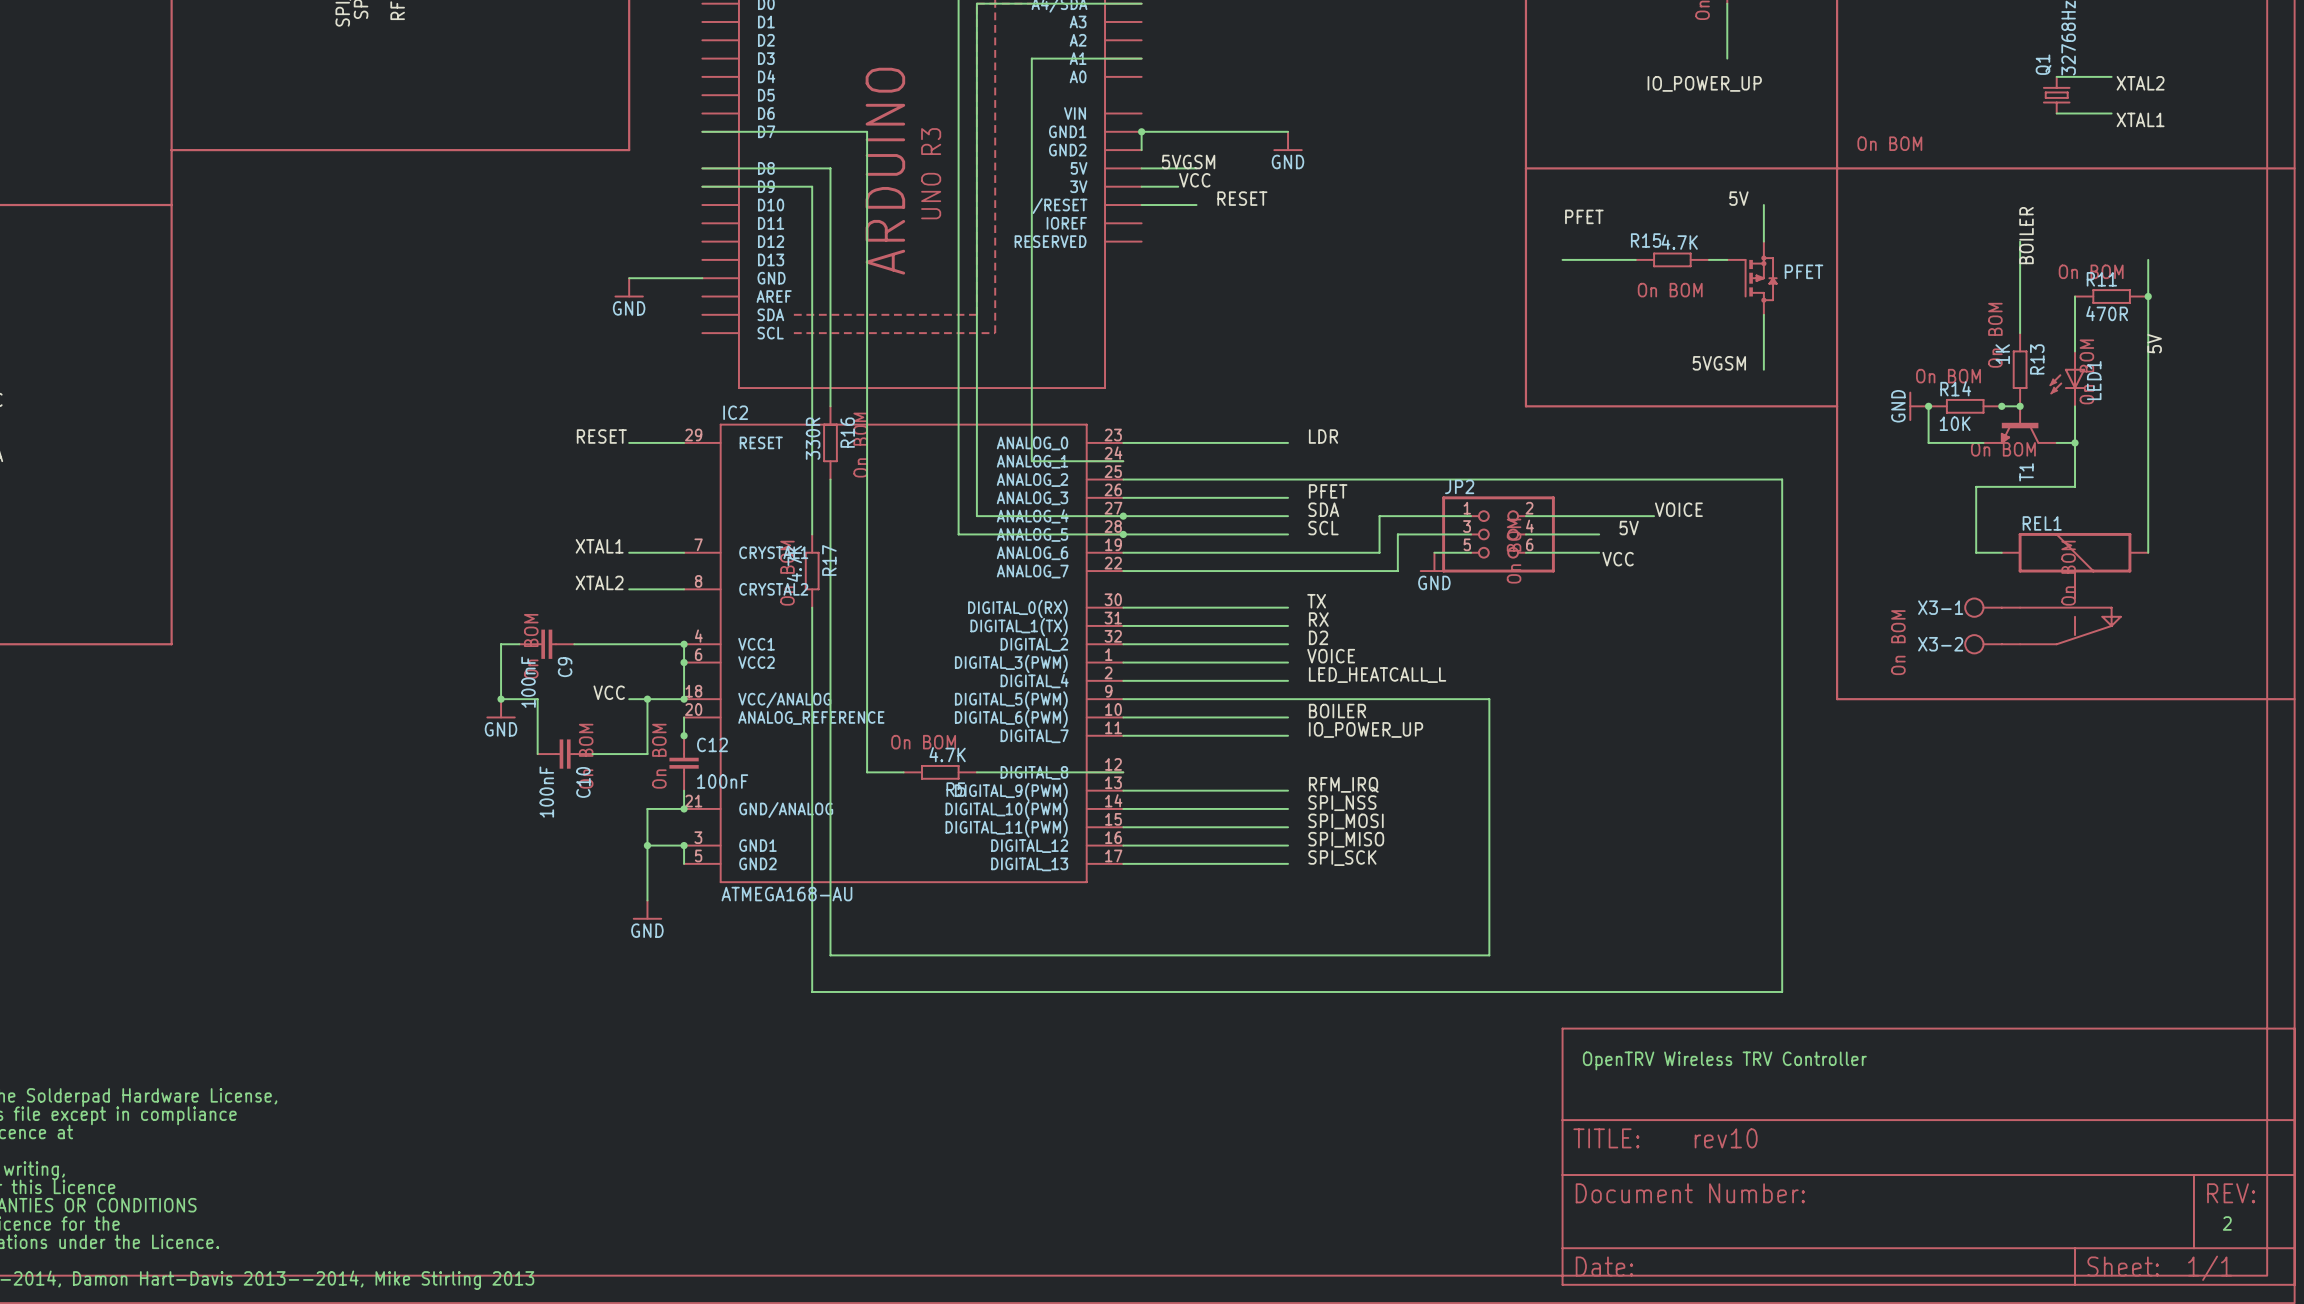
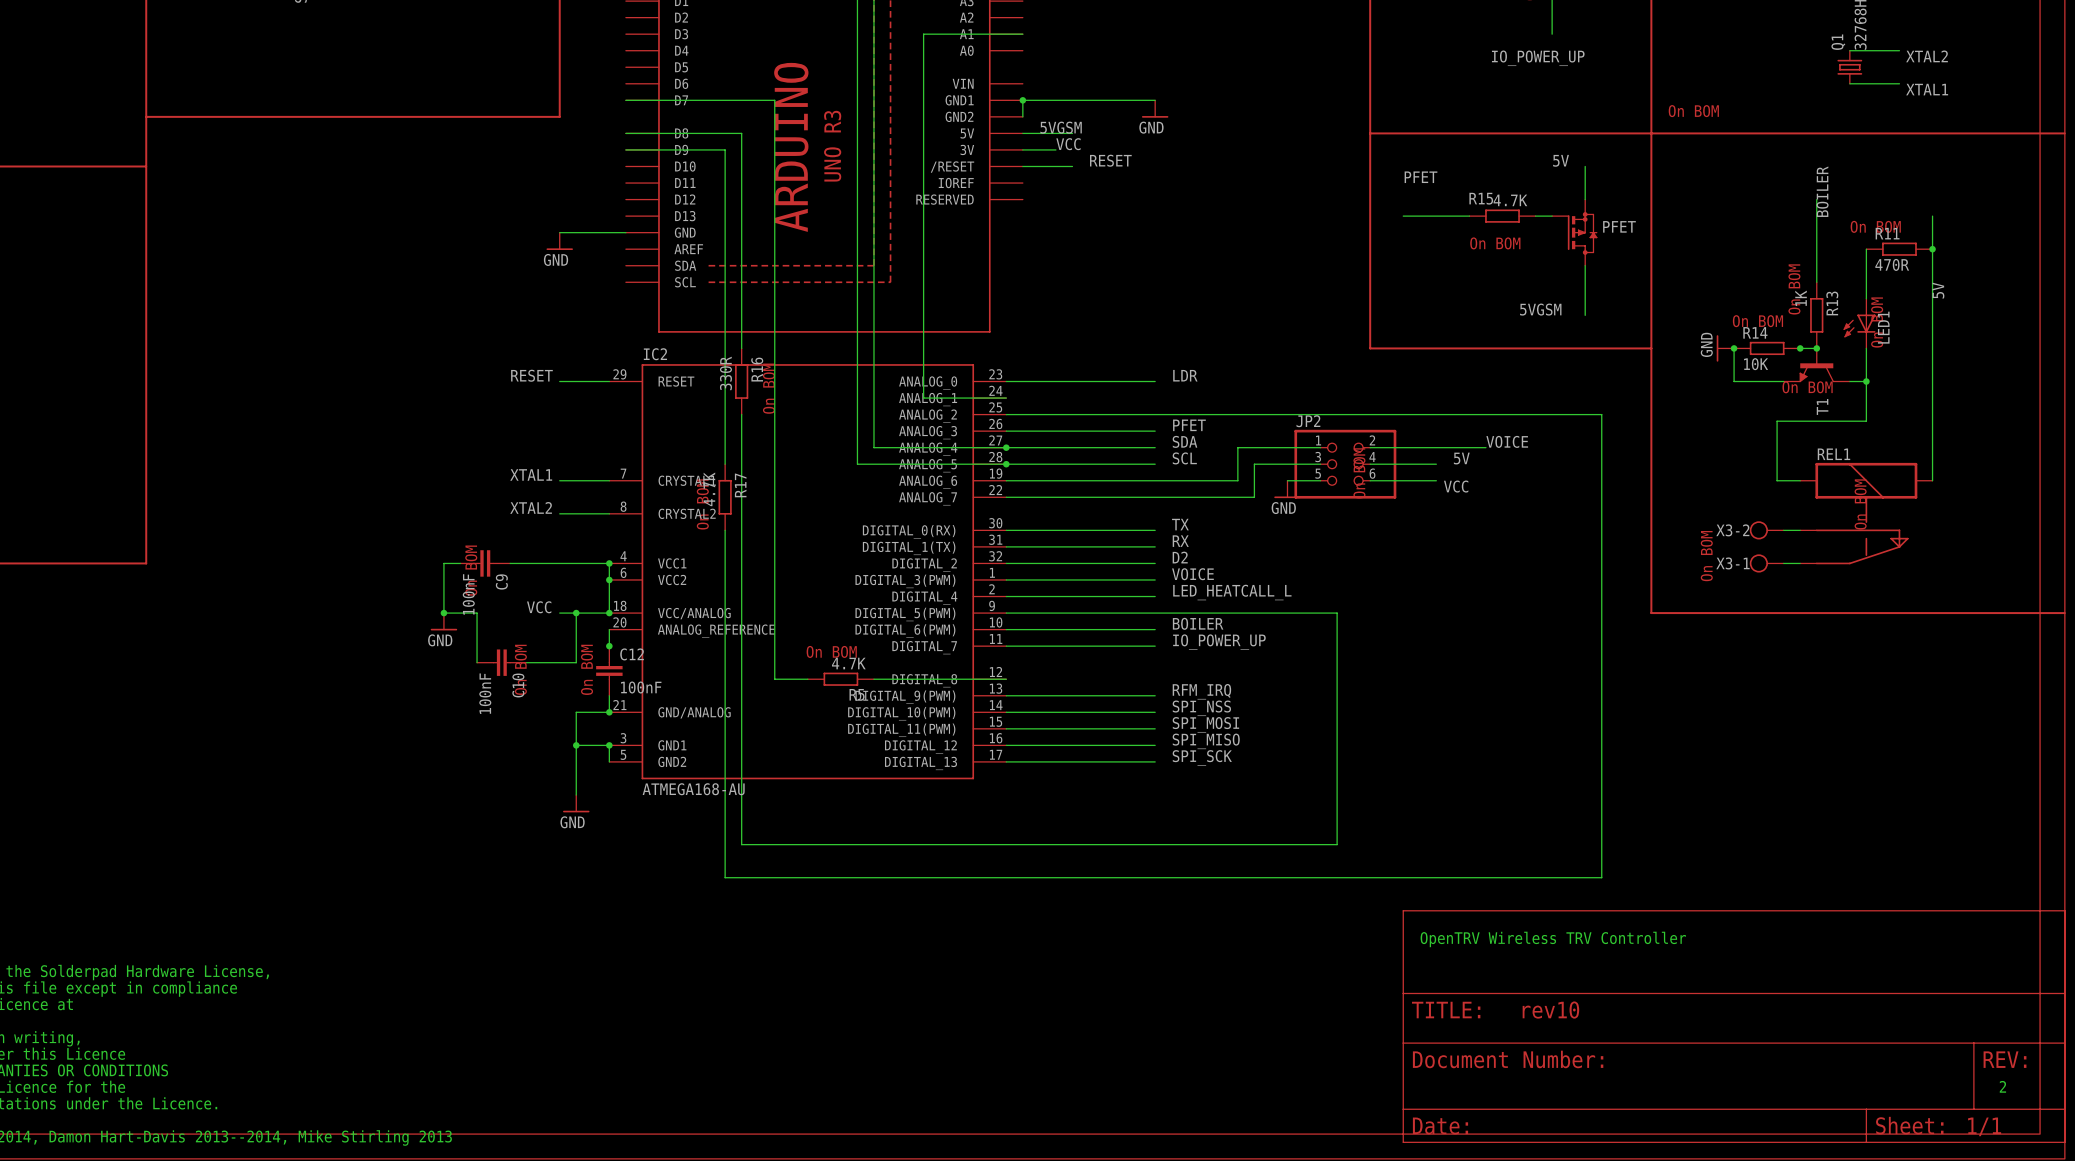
X3-1 position: (1983, 607) -> (1766, 563)
X3-2 position: (1983, 644) -> (1766, 530)

